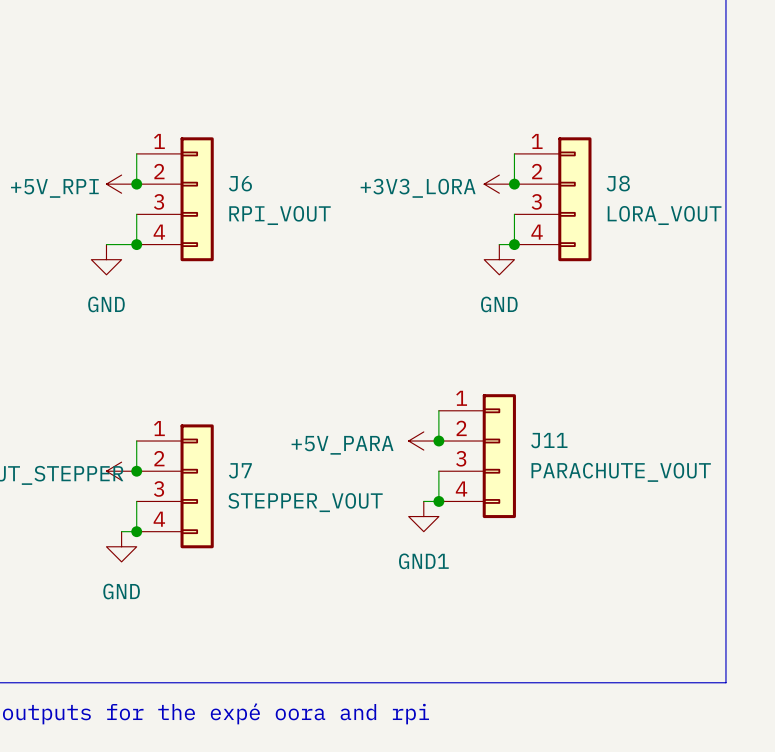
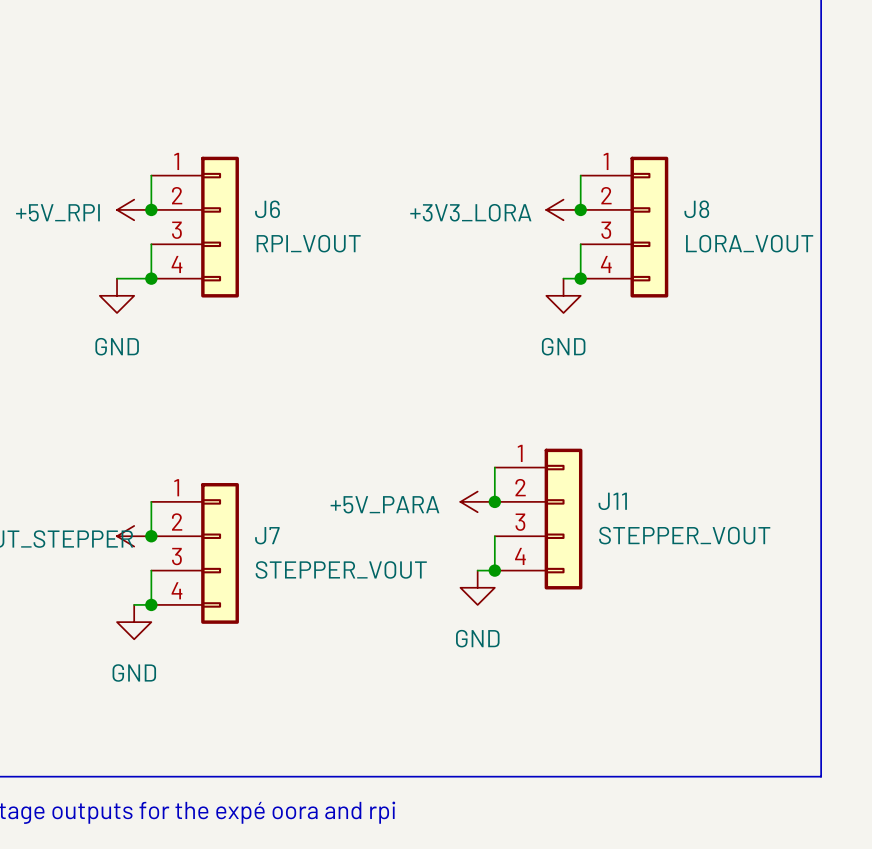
J11 value: PARACHUTE_VOUT (621, 472) -> STEPPER_VOUT (684, 535)
power symbol: GND1 (423, 516) -> GND (477, 587)

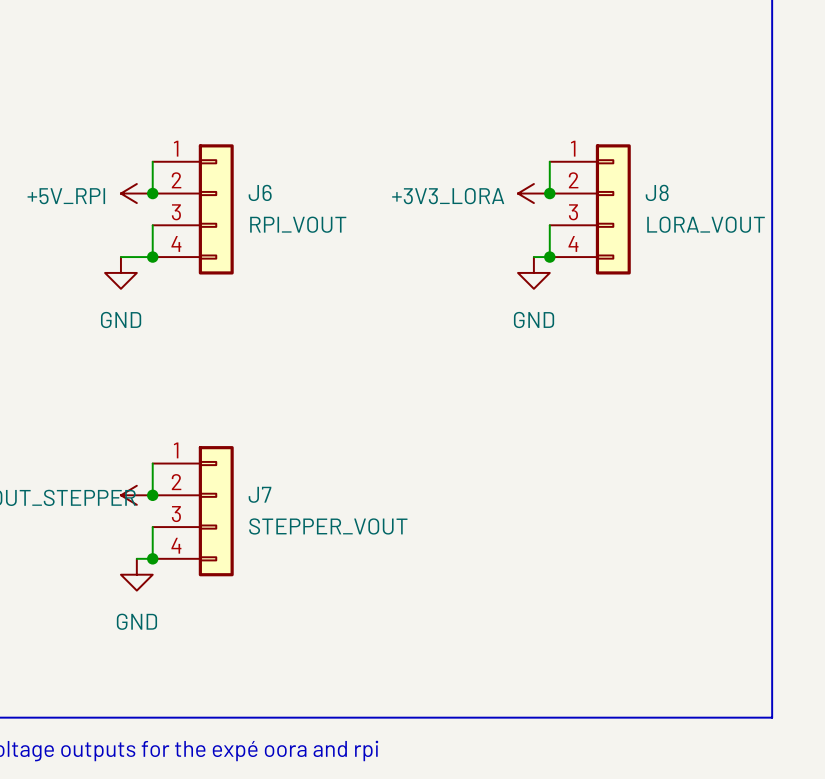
wire: (494, 467) (494, 501) -> none
power symbol: +5V_PARA (477, 501) -> none
junction: (494, 501) -> none
J11: STEPPER_VOUT (538, 519) -> none
wire: (494, 536) (494, 570) (477, 570) -> none
junction: (494, 570) -> none
power symbol: GND (477, 587) -> none

